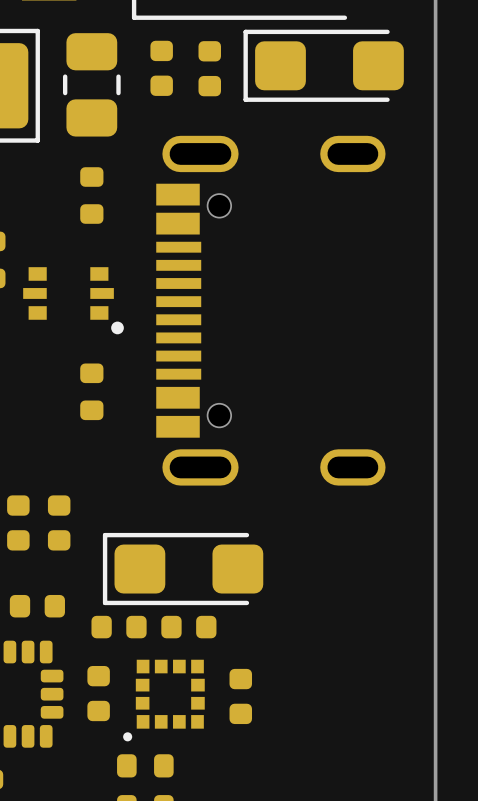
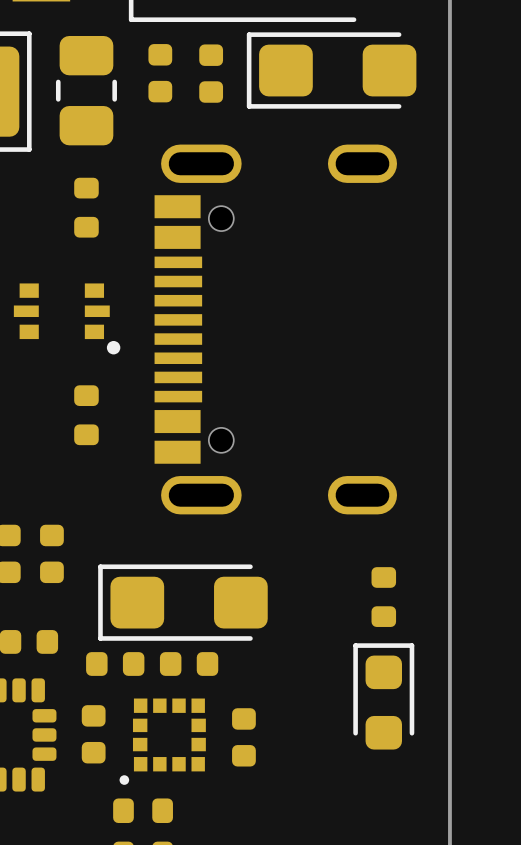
part: none -> (383, 597)
part: none -> (383, 696)

